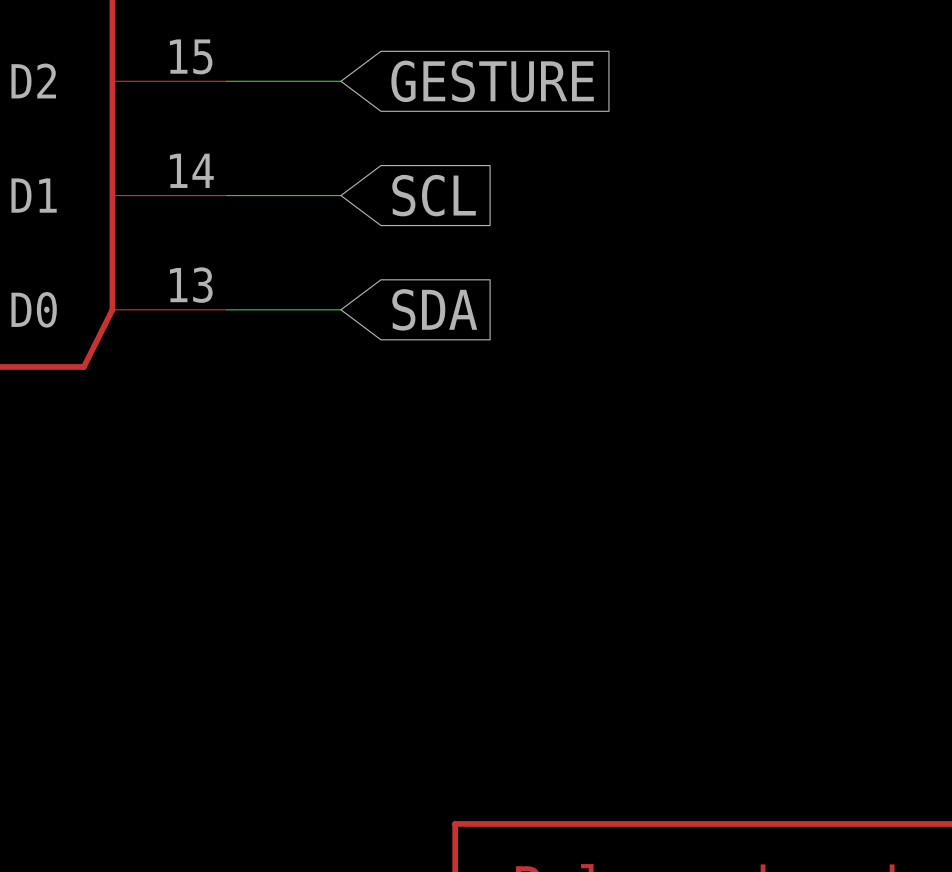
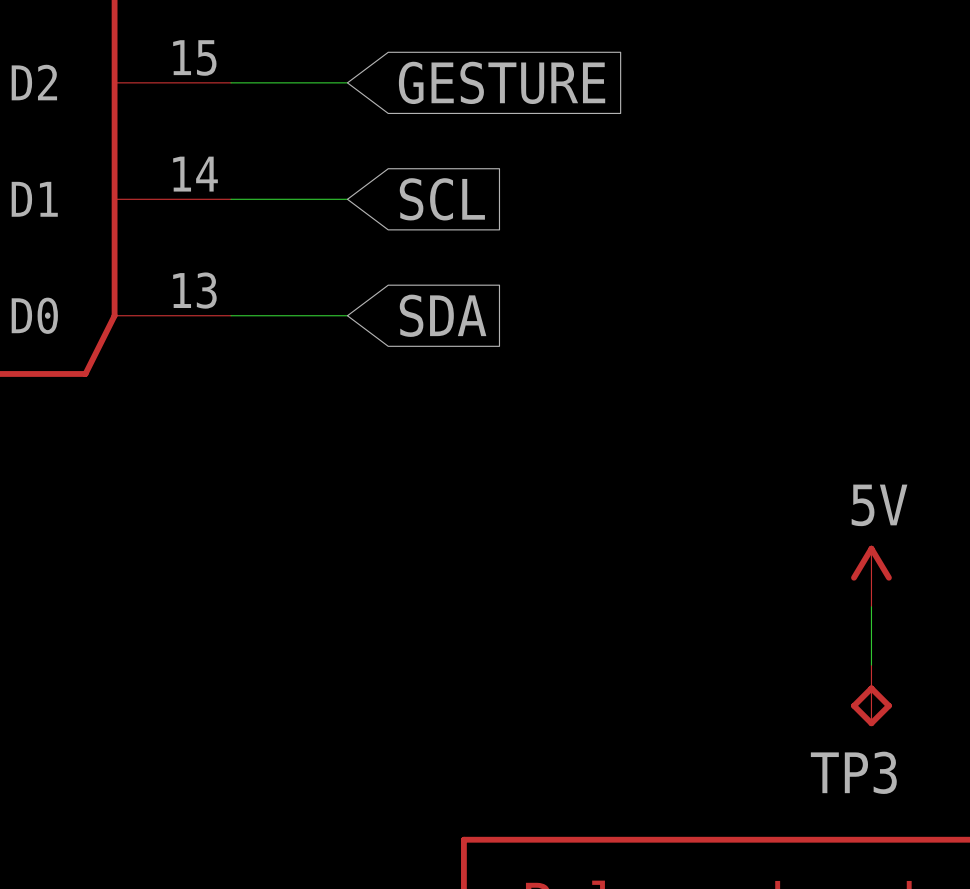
power symbol: none -> 5V (871, 576)
wire: none -> (871, 606) (871, 665)
TP3: none -> (871, 695)

